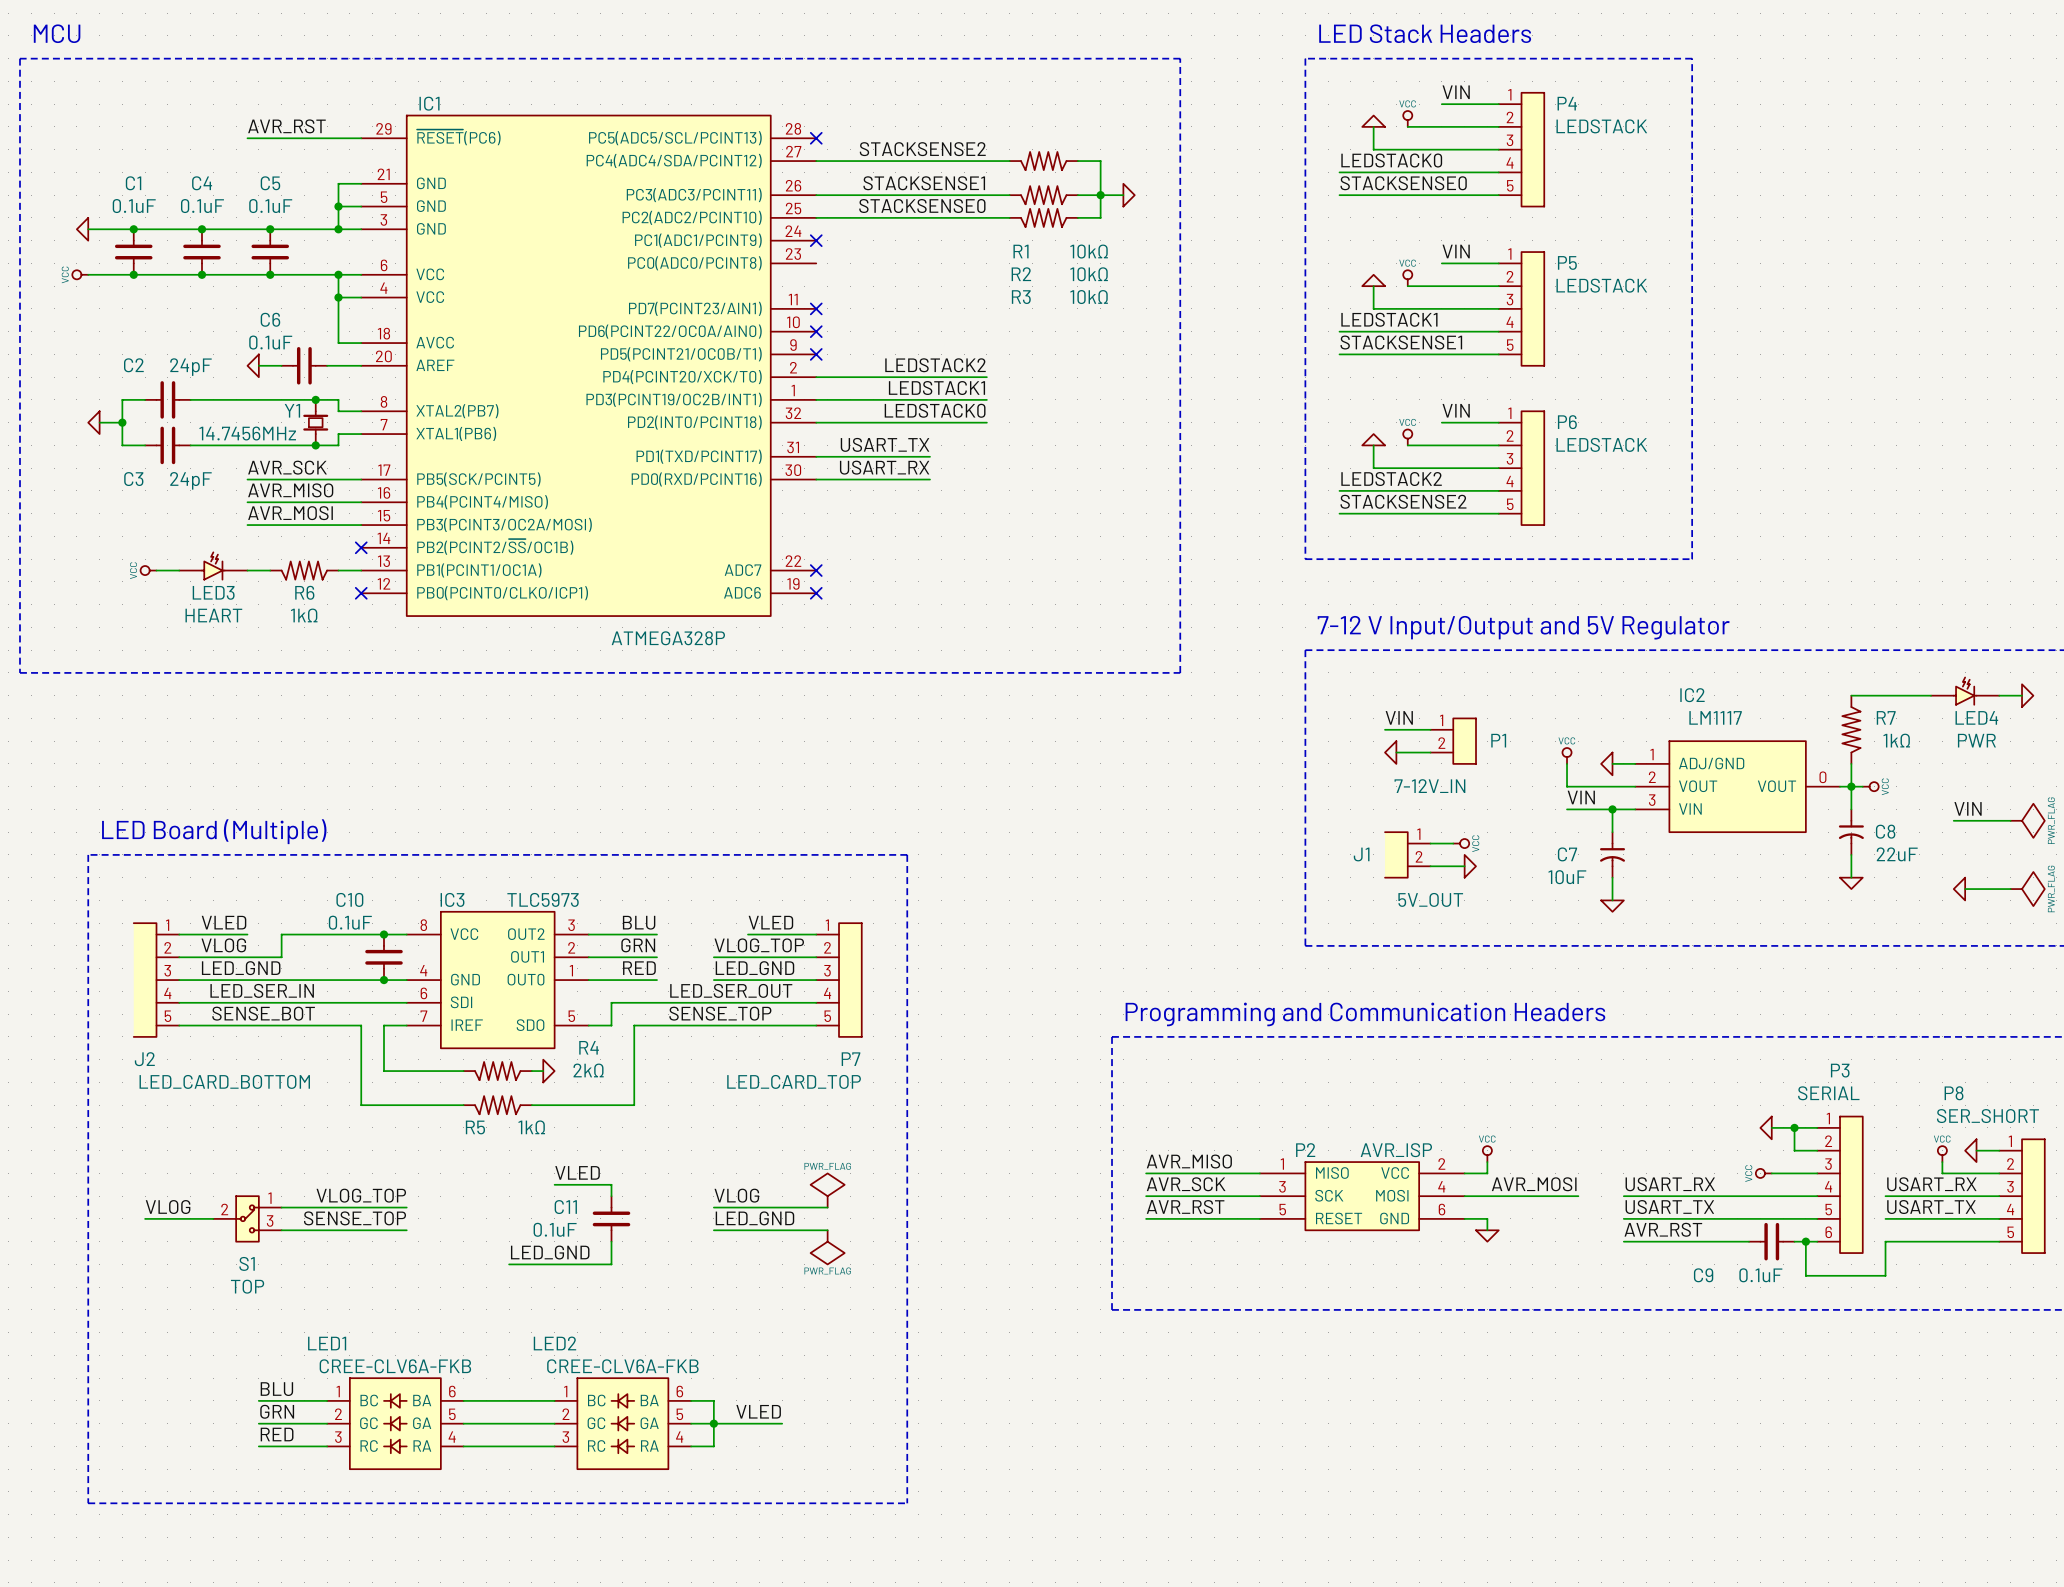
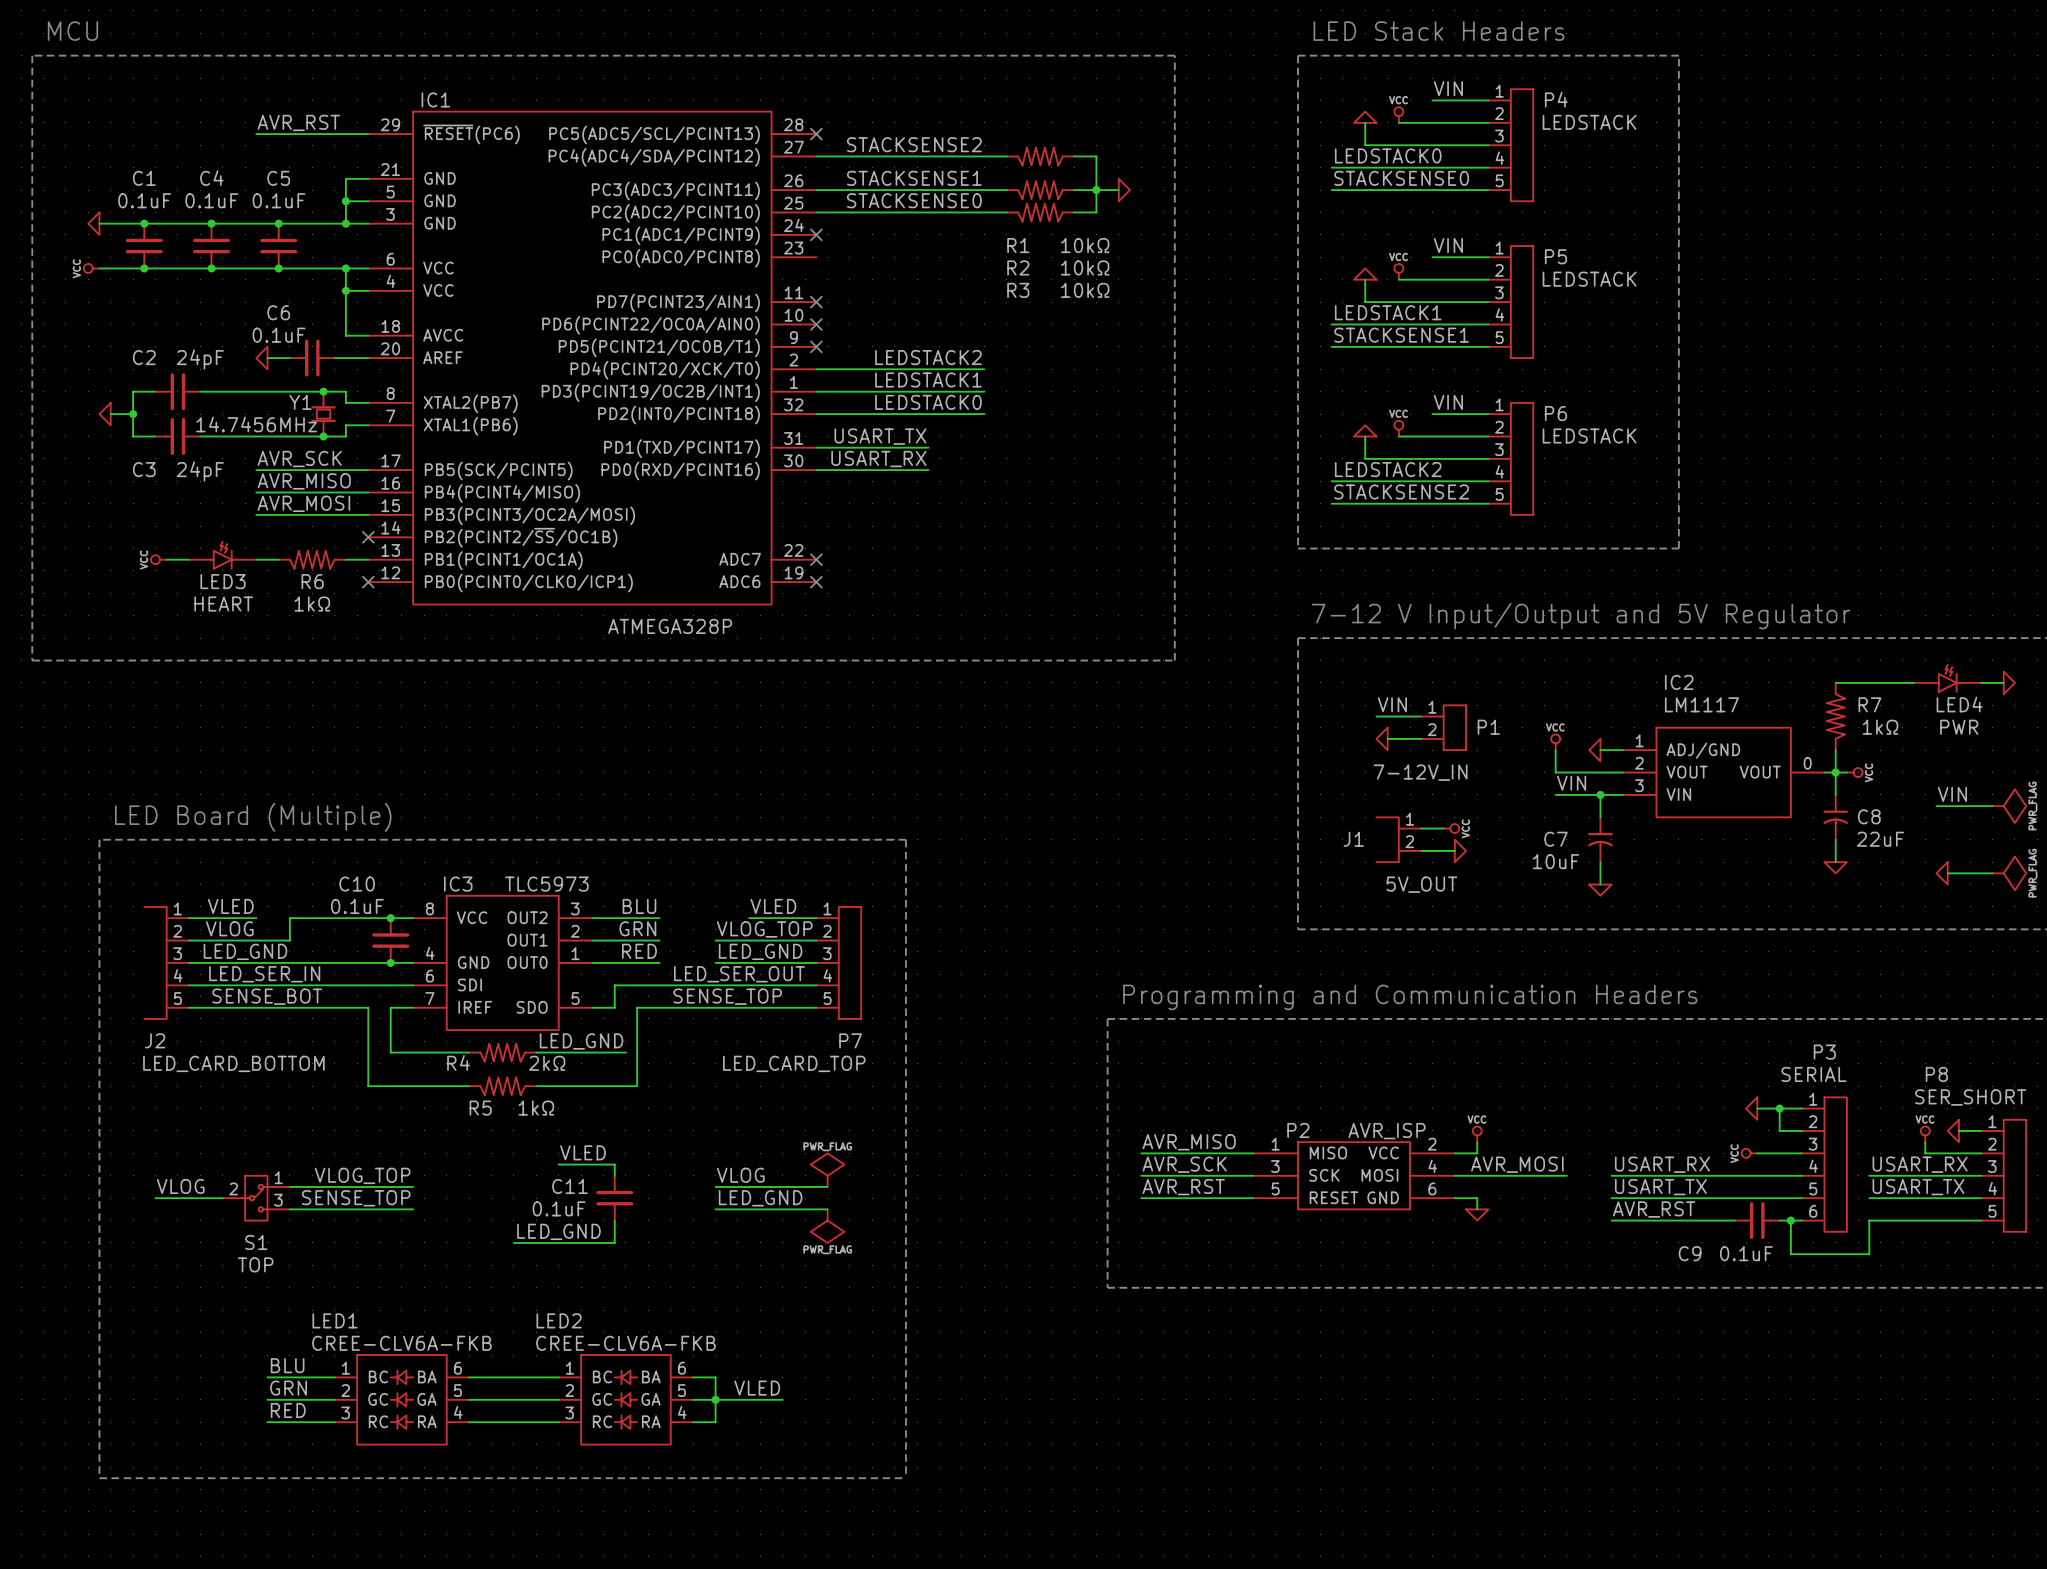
R4 name position: R4 (589, 1047) -> R4 (458, 1062)
label: none -> LED_GND (581, 1041)
R4 value position: 2kΩ (588, 1070) -> 2kΩ (547, 1063)
wire: none -> (547, 1052) (625, 1052)
power symbol: (548, 1071) -> none

